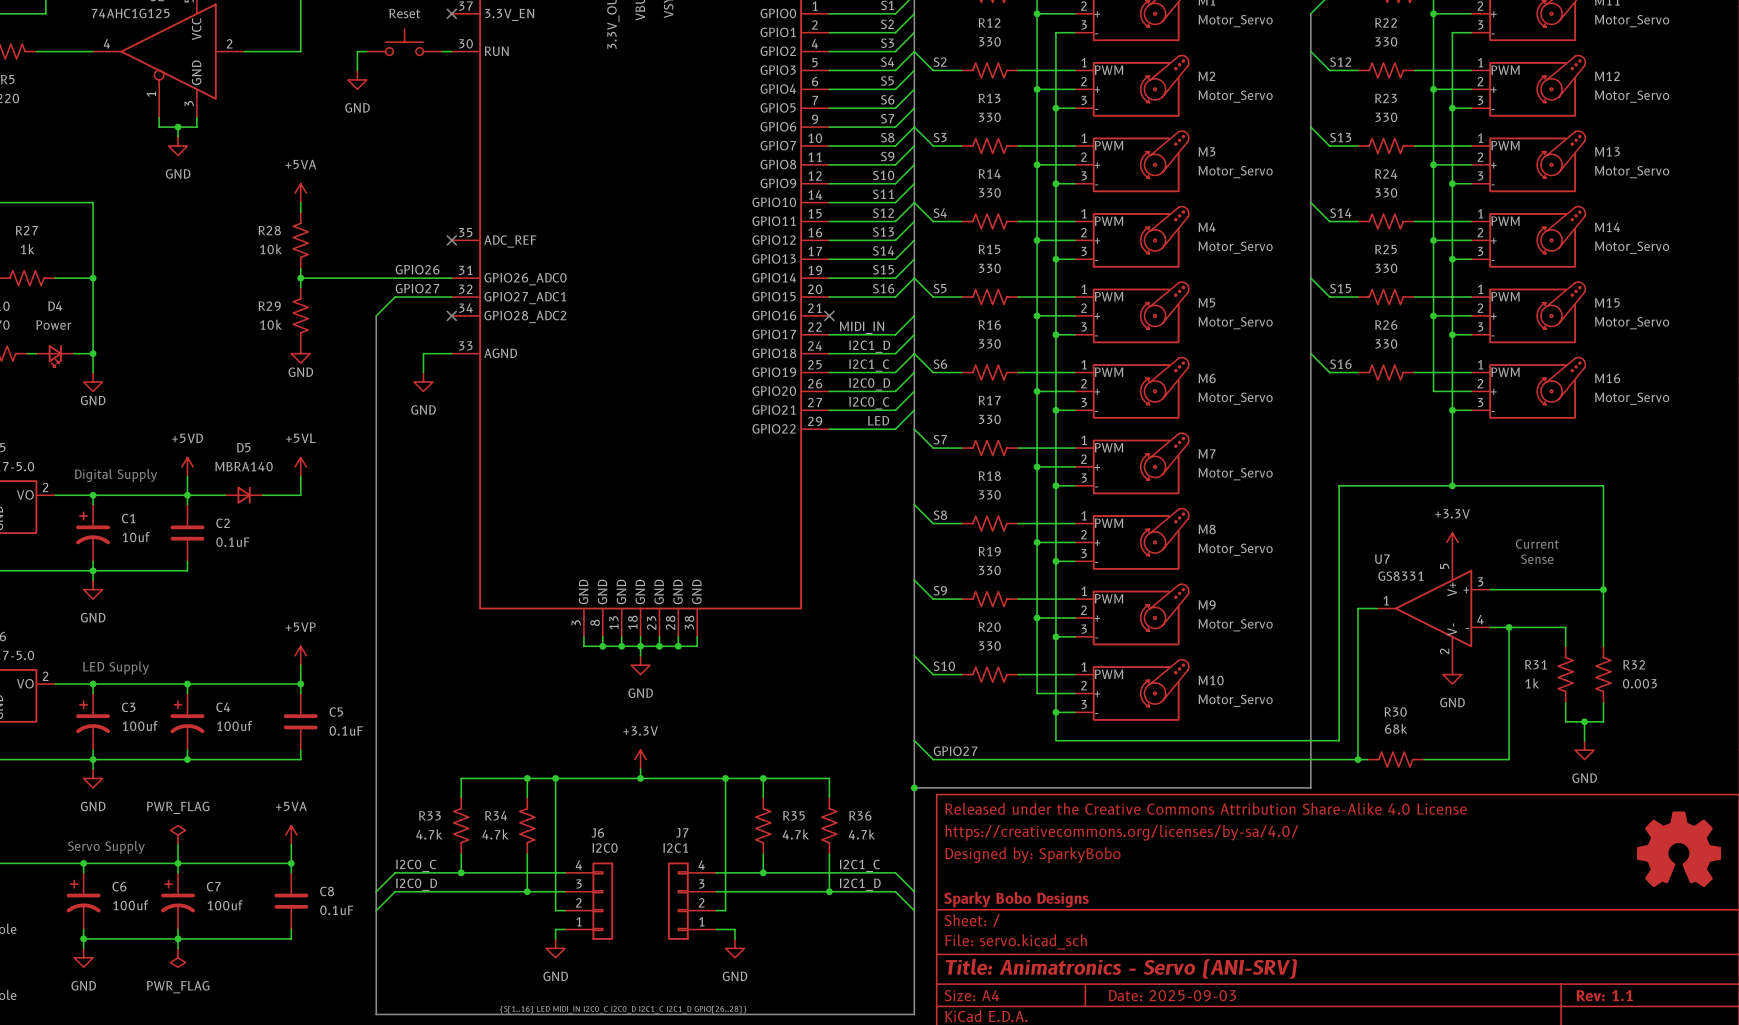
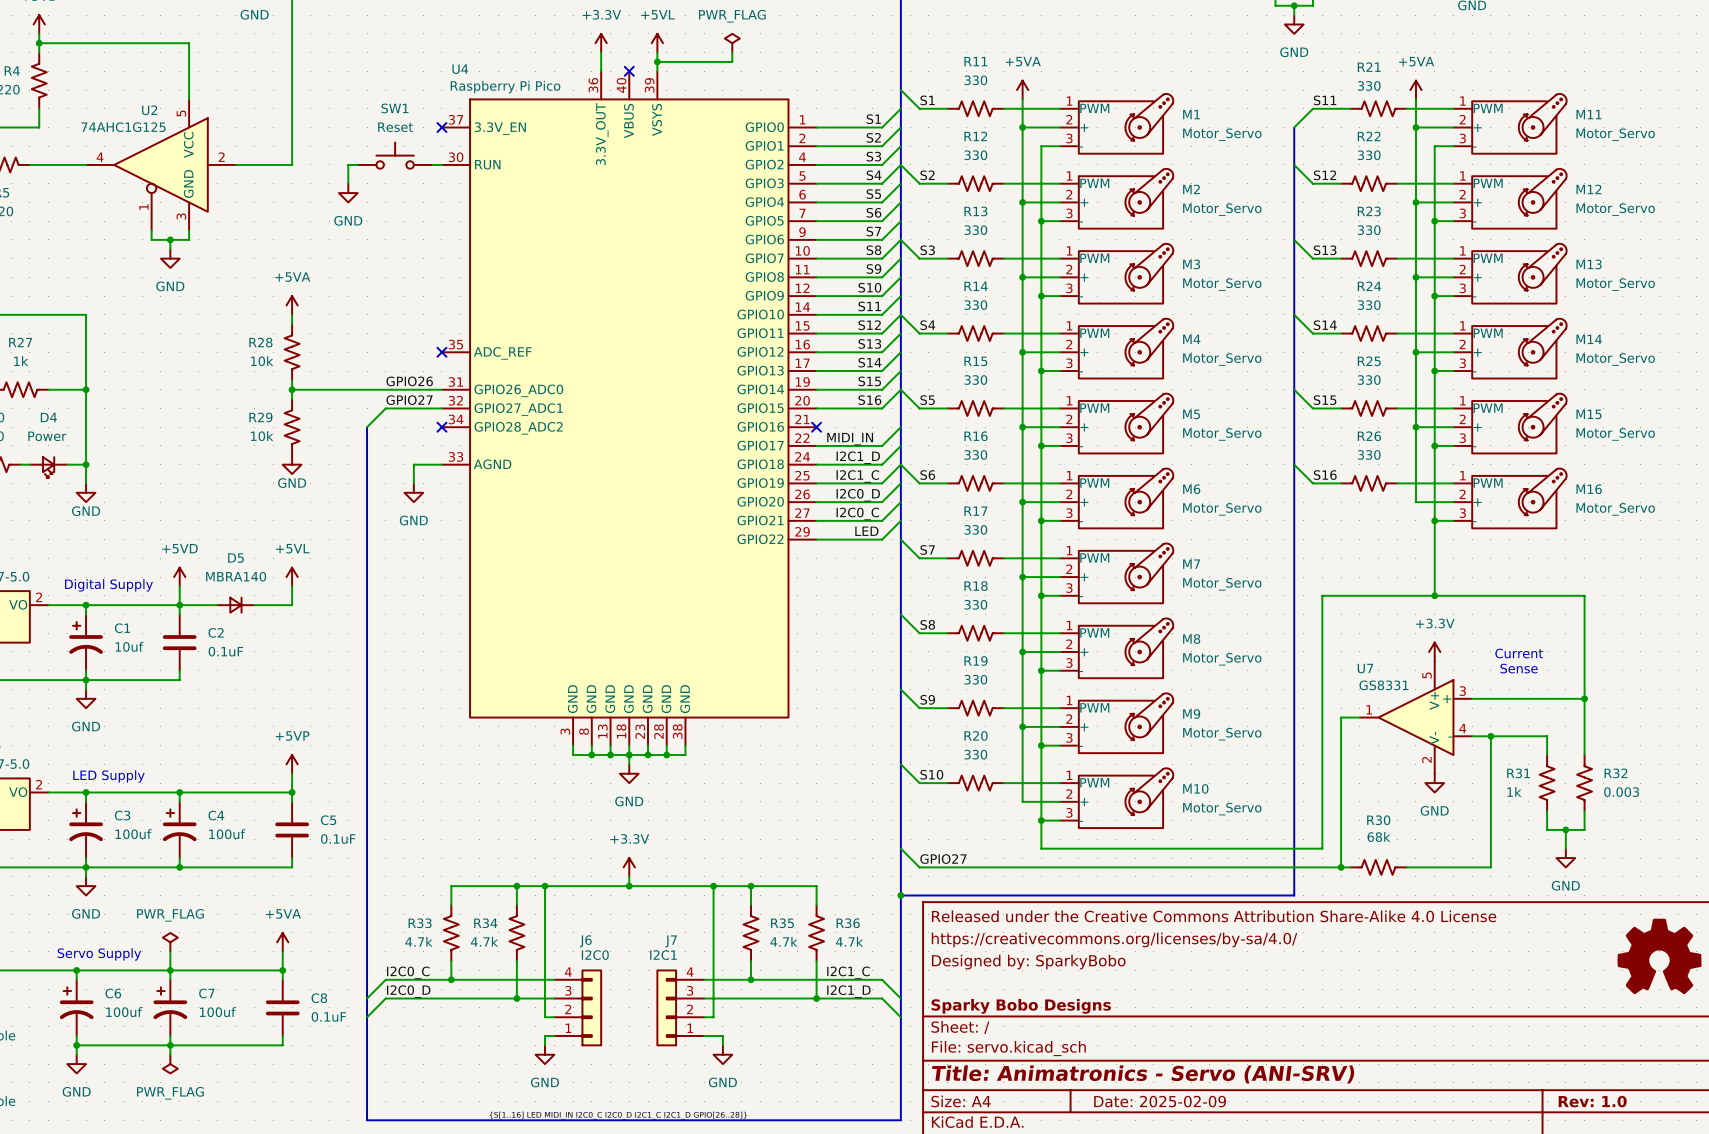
title block: Date: 2025-09-03 (1172, 995) -> Date: 2025-02-09 (1160, 1101)
title block: Rev: 1.1 (1604, 995) -> Rev: 1.0 (1592, 1101)

